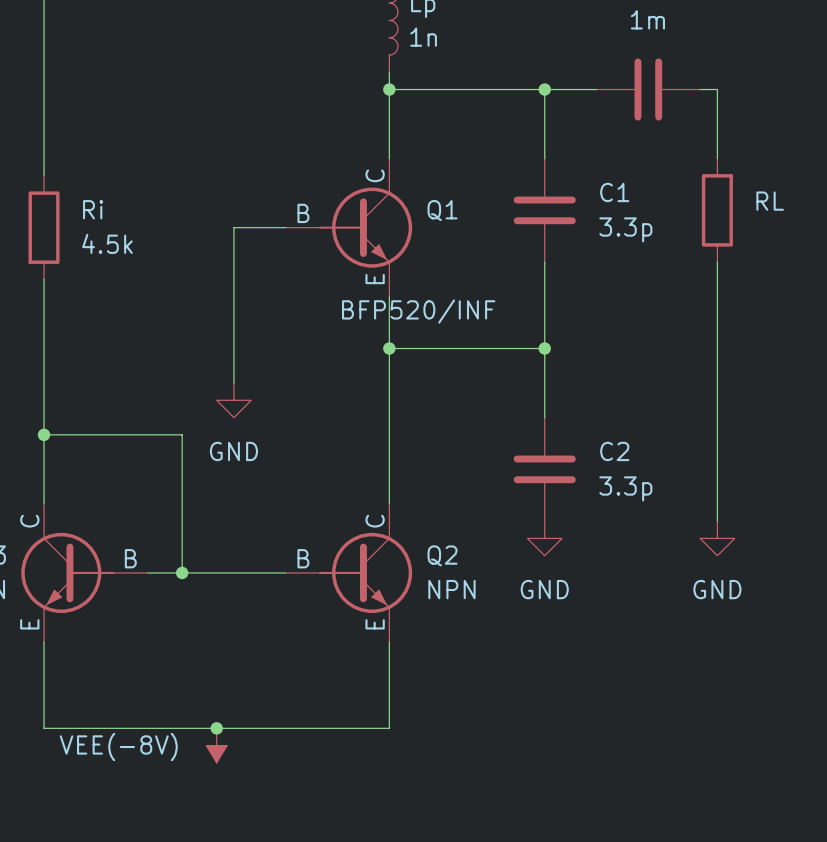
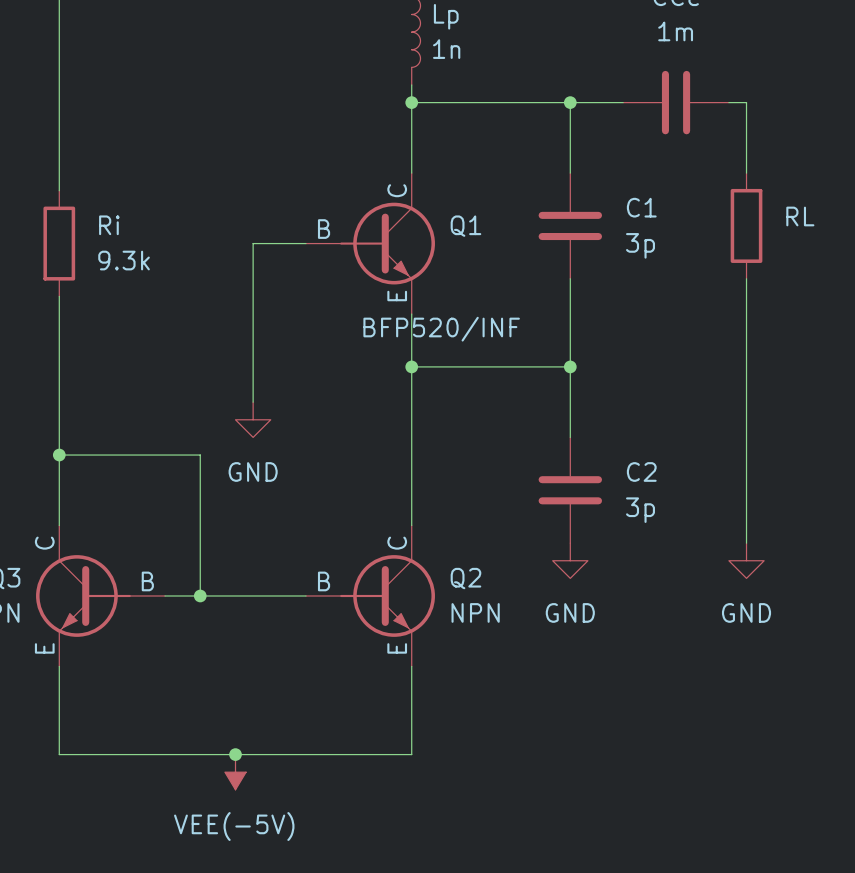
C1 value: 3.3p (625, 229) -> 3p (640, 245)
Ri value: 4.5k (107, 243) -> 9.3k (124, 260)
C2 value: 3.3p (625, 488) -> 3p (640, 510)
power symbol: VEE(-8V) (216, 745) -> VEE(-5V) (235, 772)

